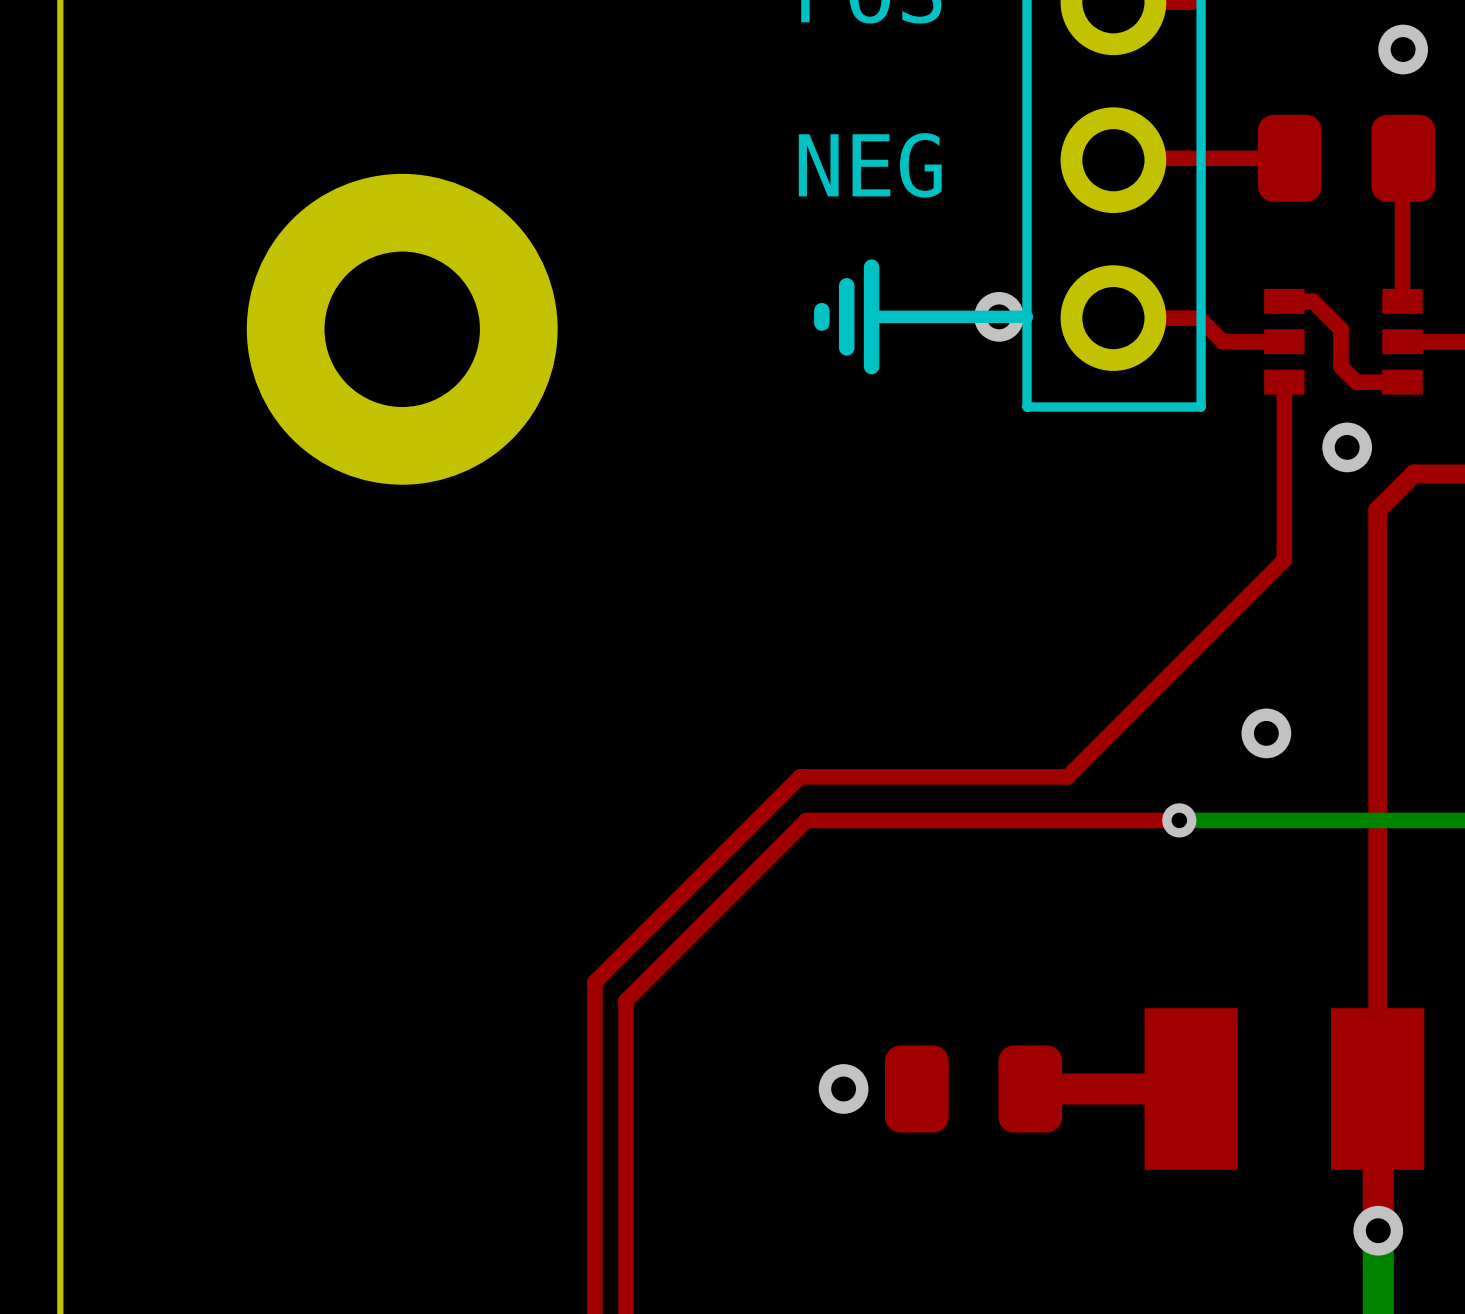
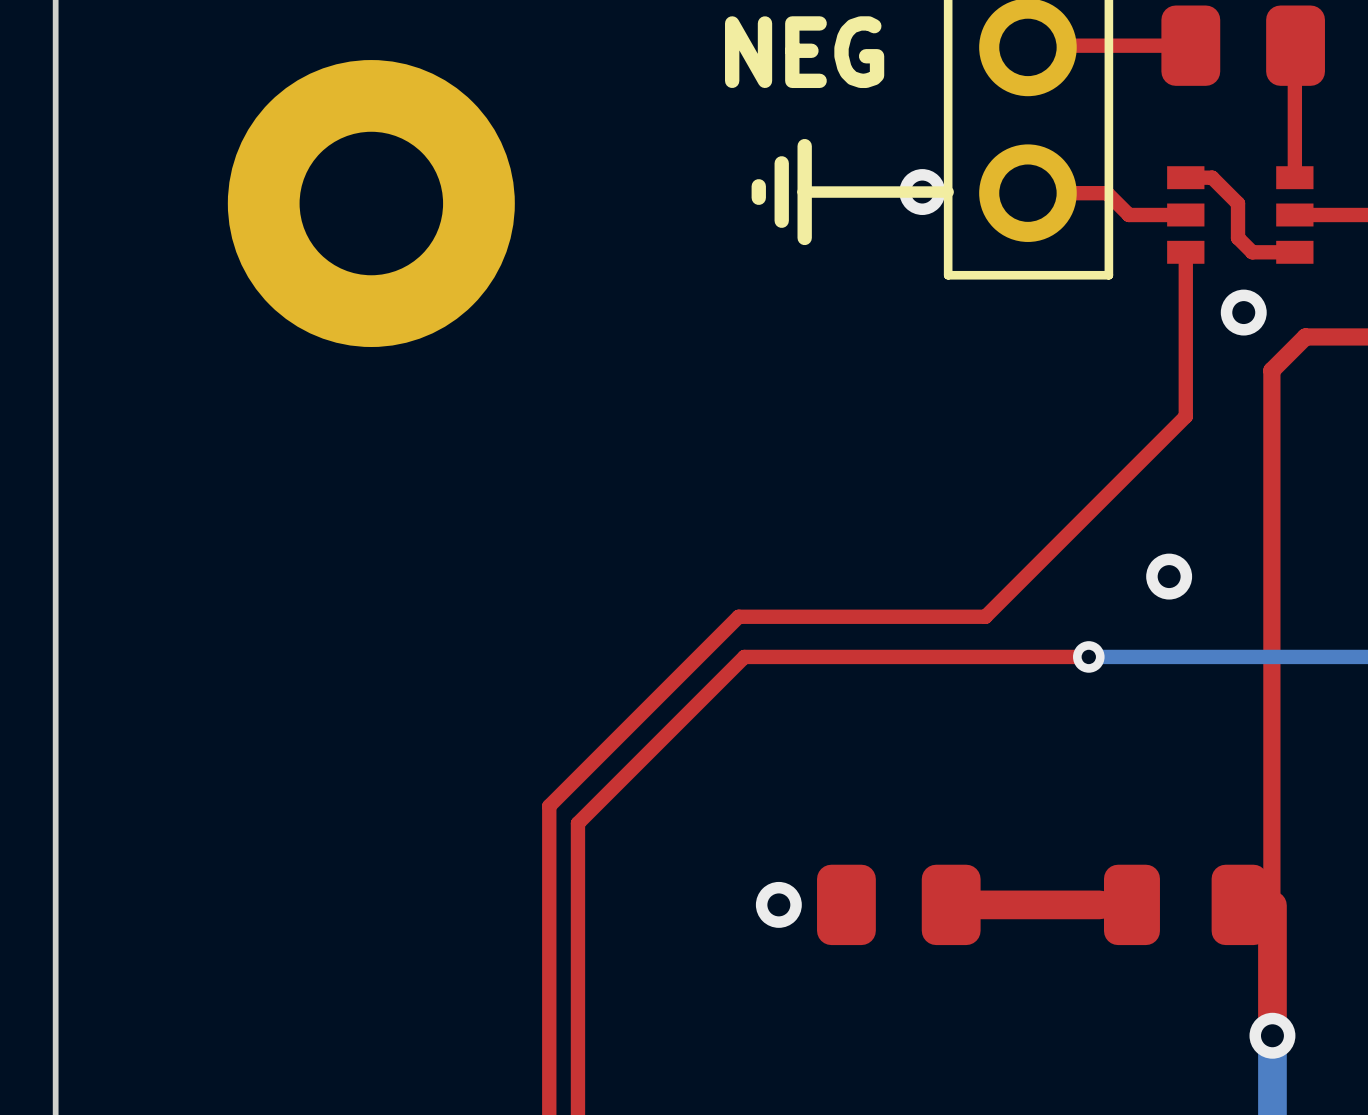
part footprint: [1144, 1008, 1425, 1170] -> [1103, 864, 1268, 946]

